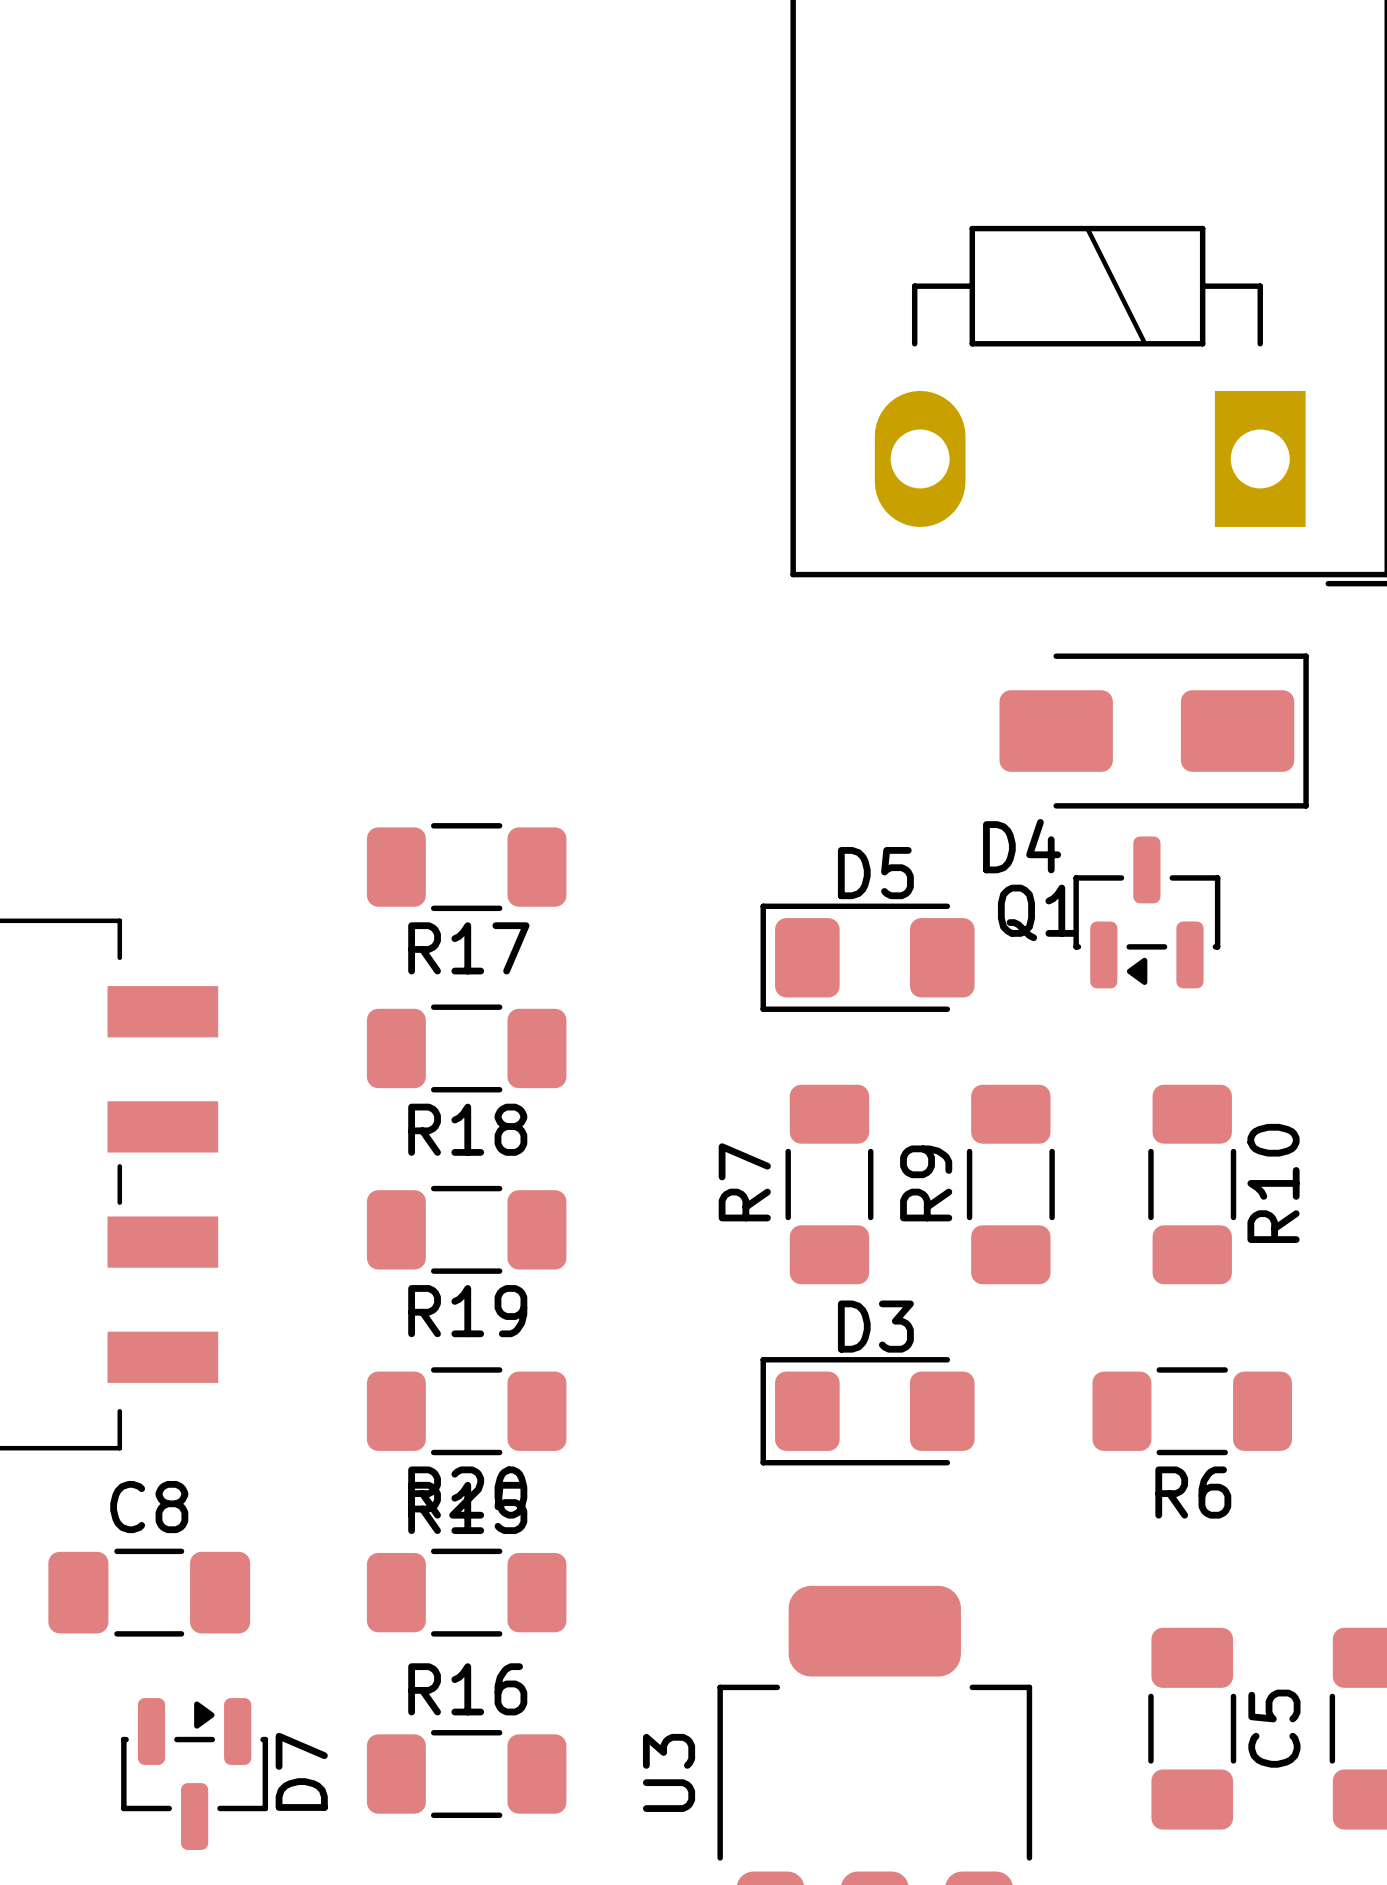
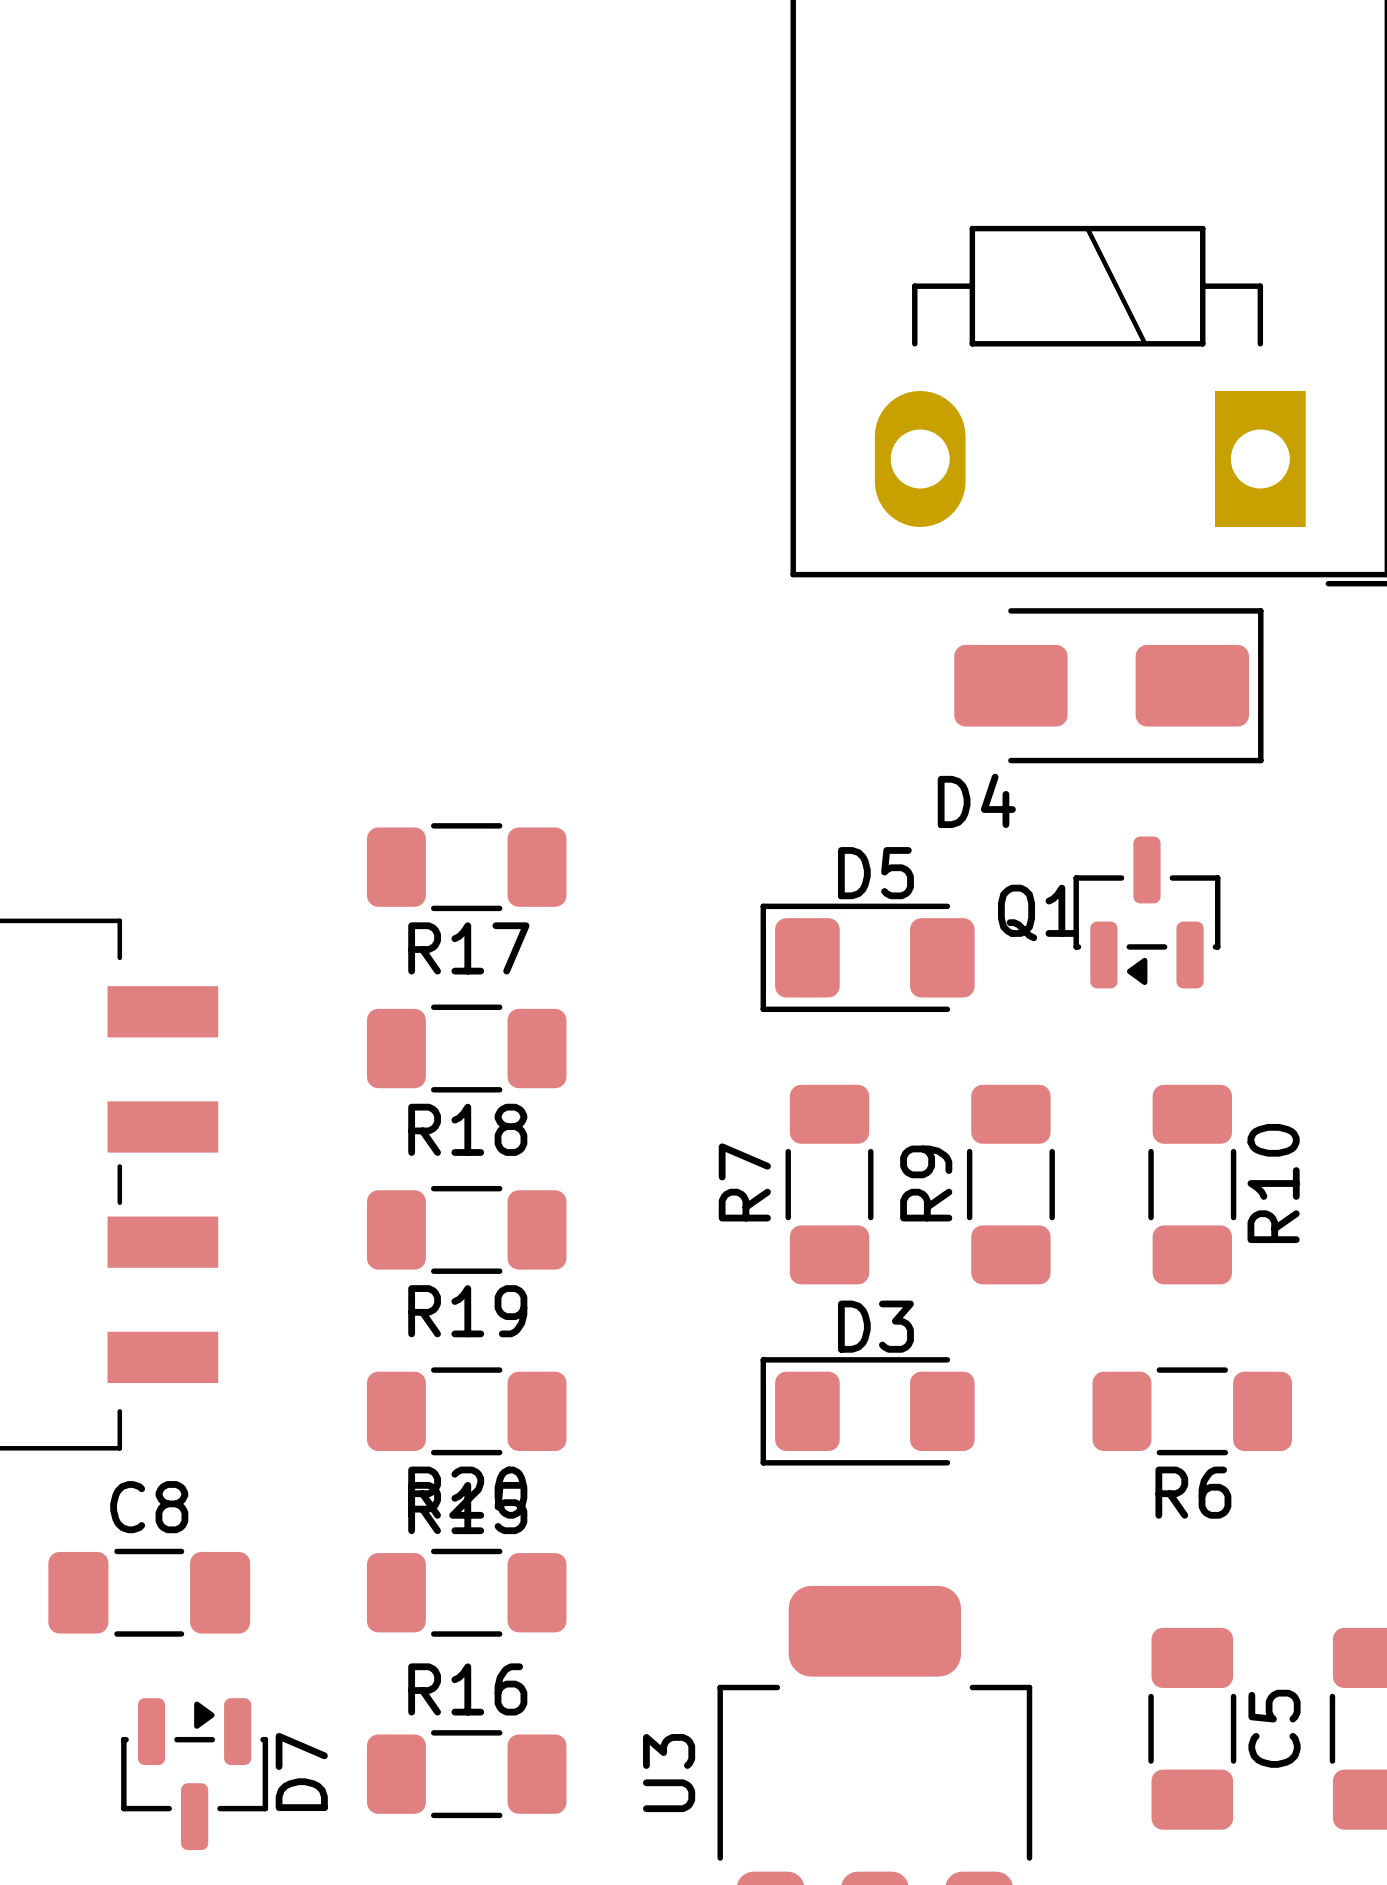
D4 position: (1154, 731) -> (1108, 685)

